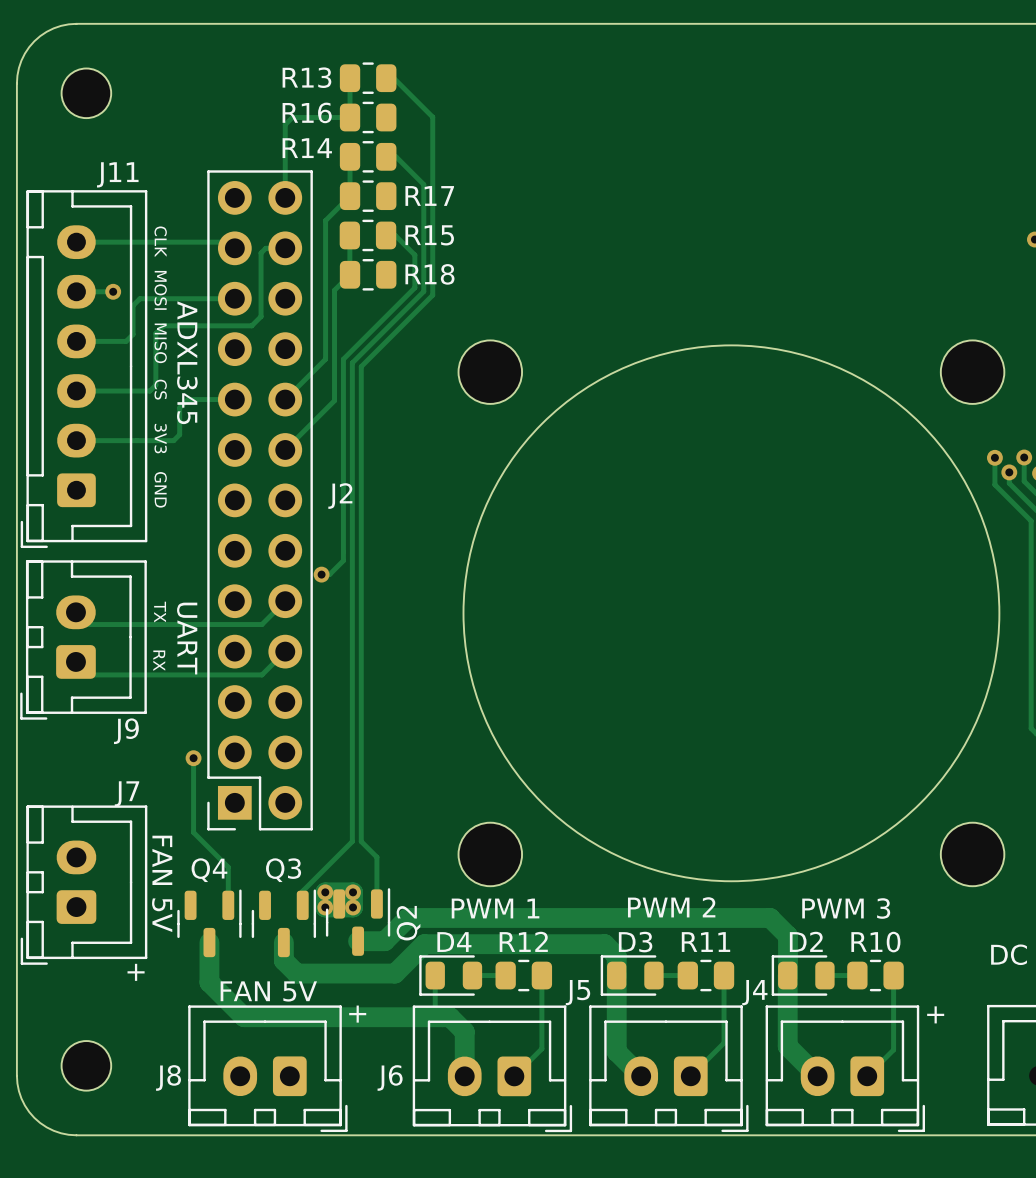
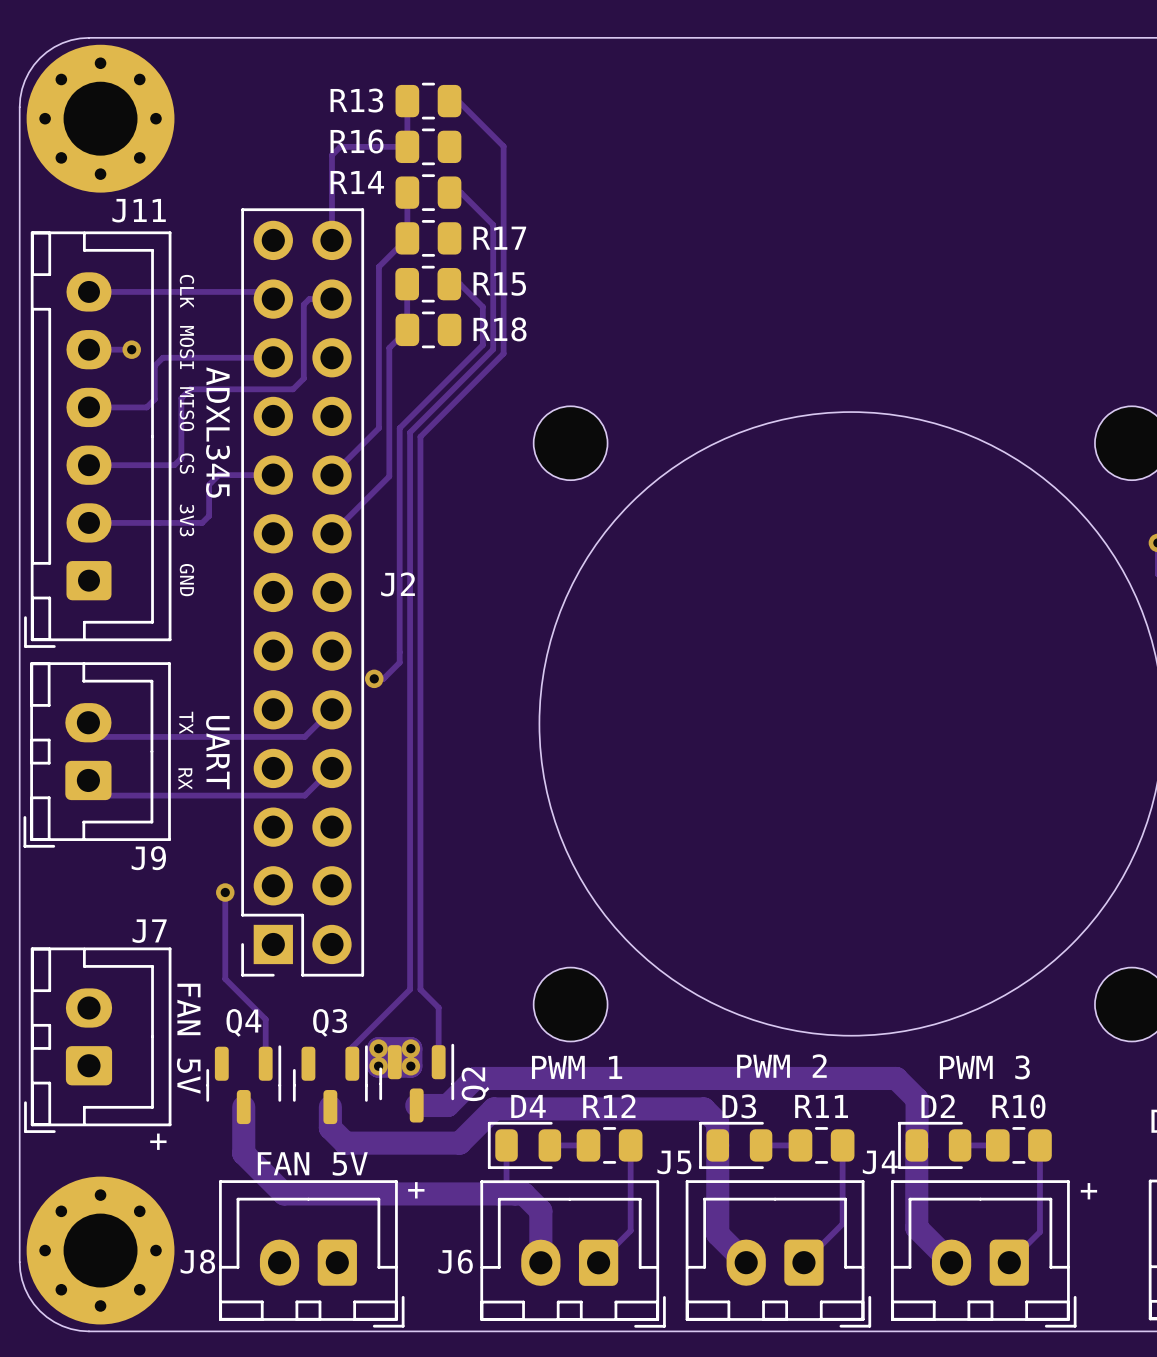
part footprint: [61, 68, 112, 119] -> [26, 44, 175, 193]
part footprint: [61, 1041, 112, 1091] -> [26, 1176, 175, 1325]

